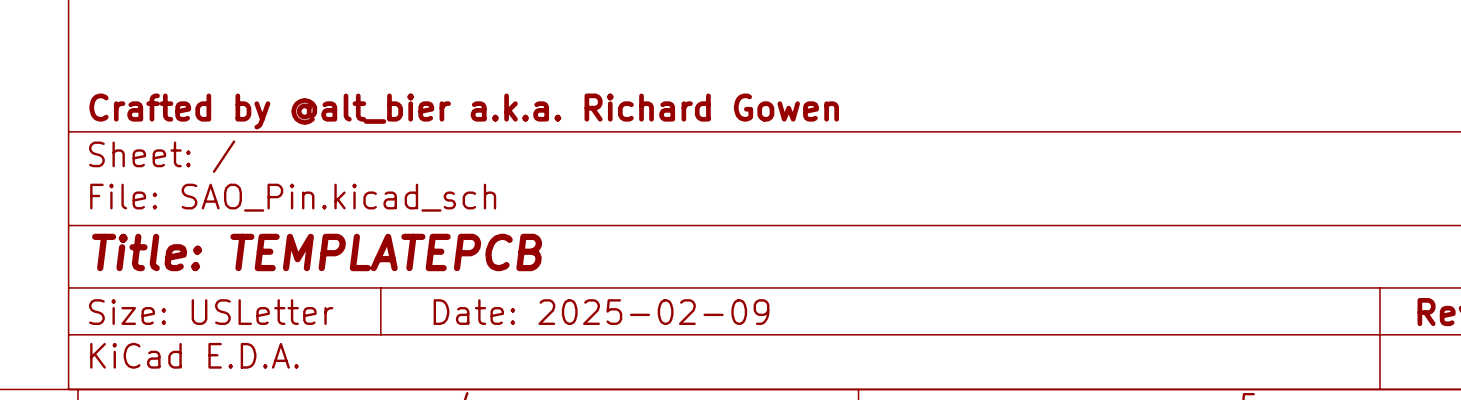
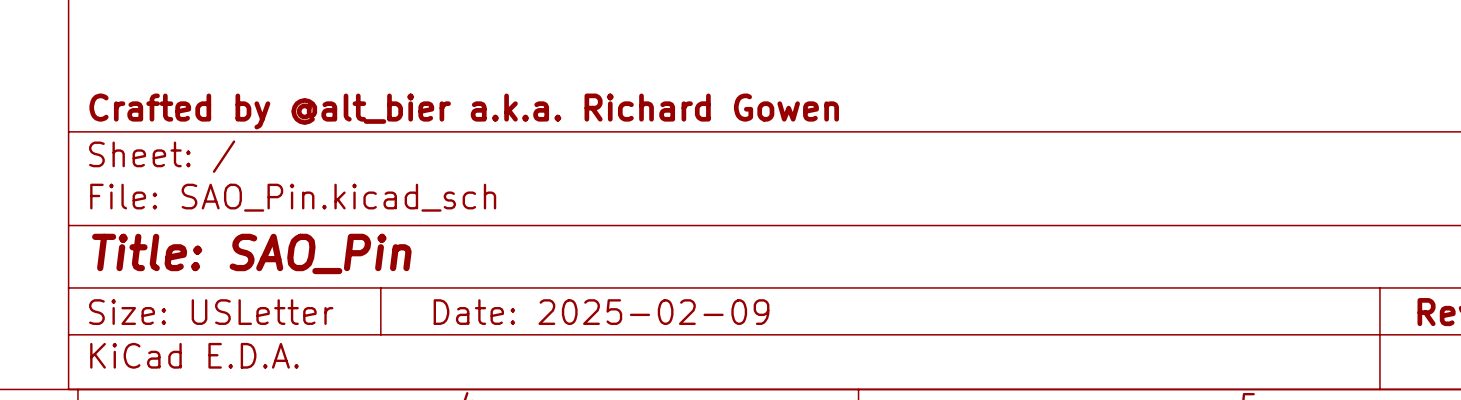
title block: Title: TEMPLATEPCB (317, 252) -> Title: SAO_Pin (251, 253)

